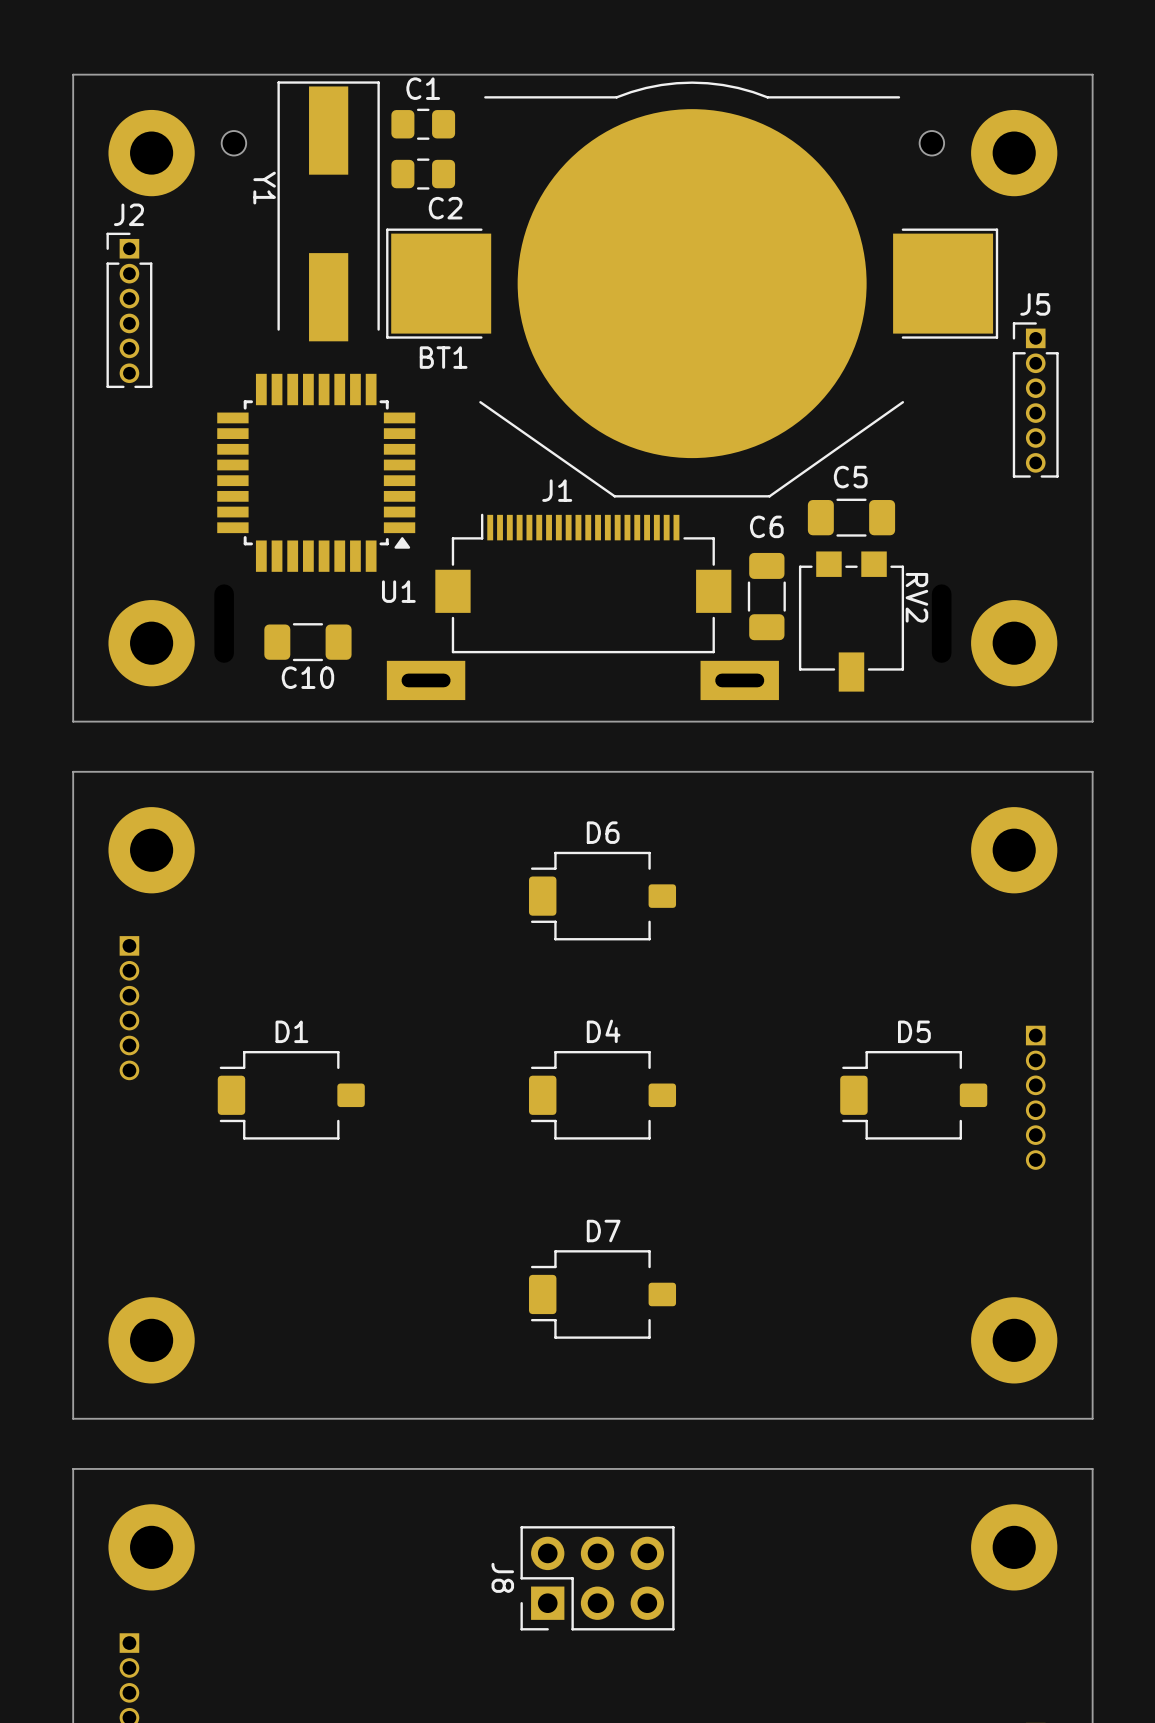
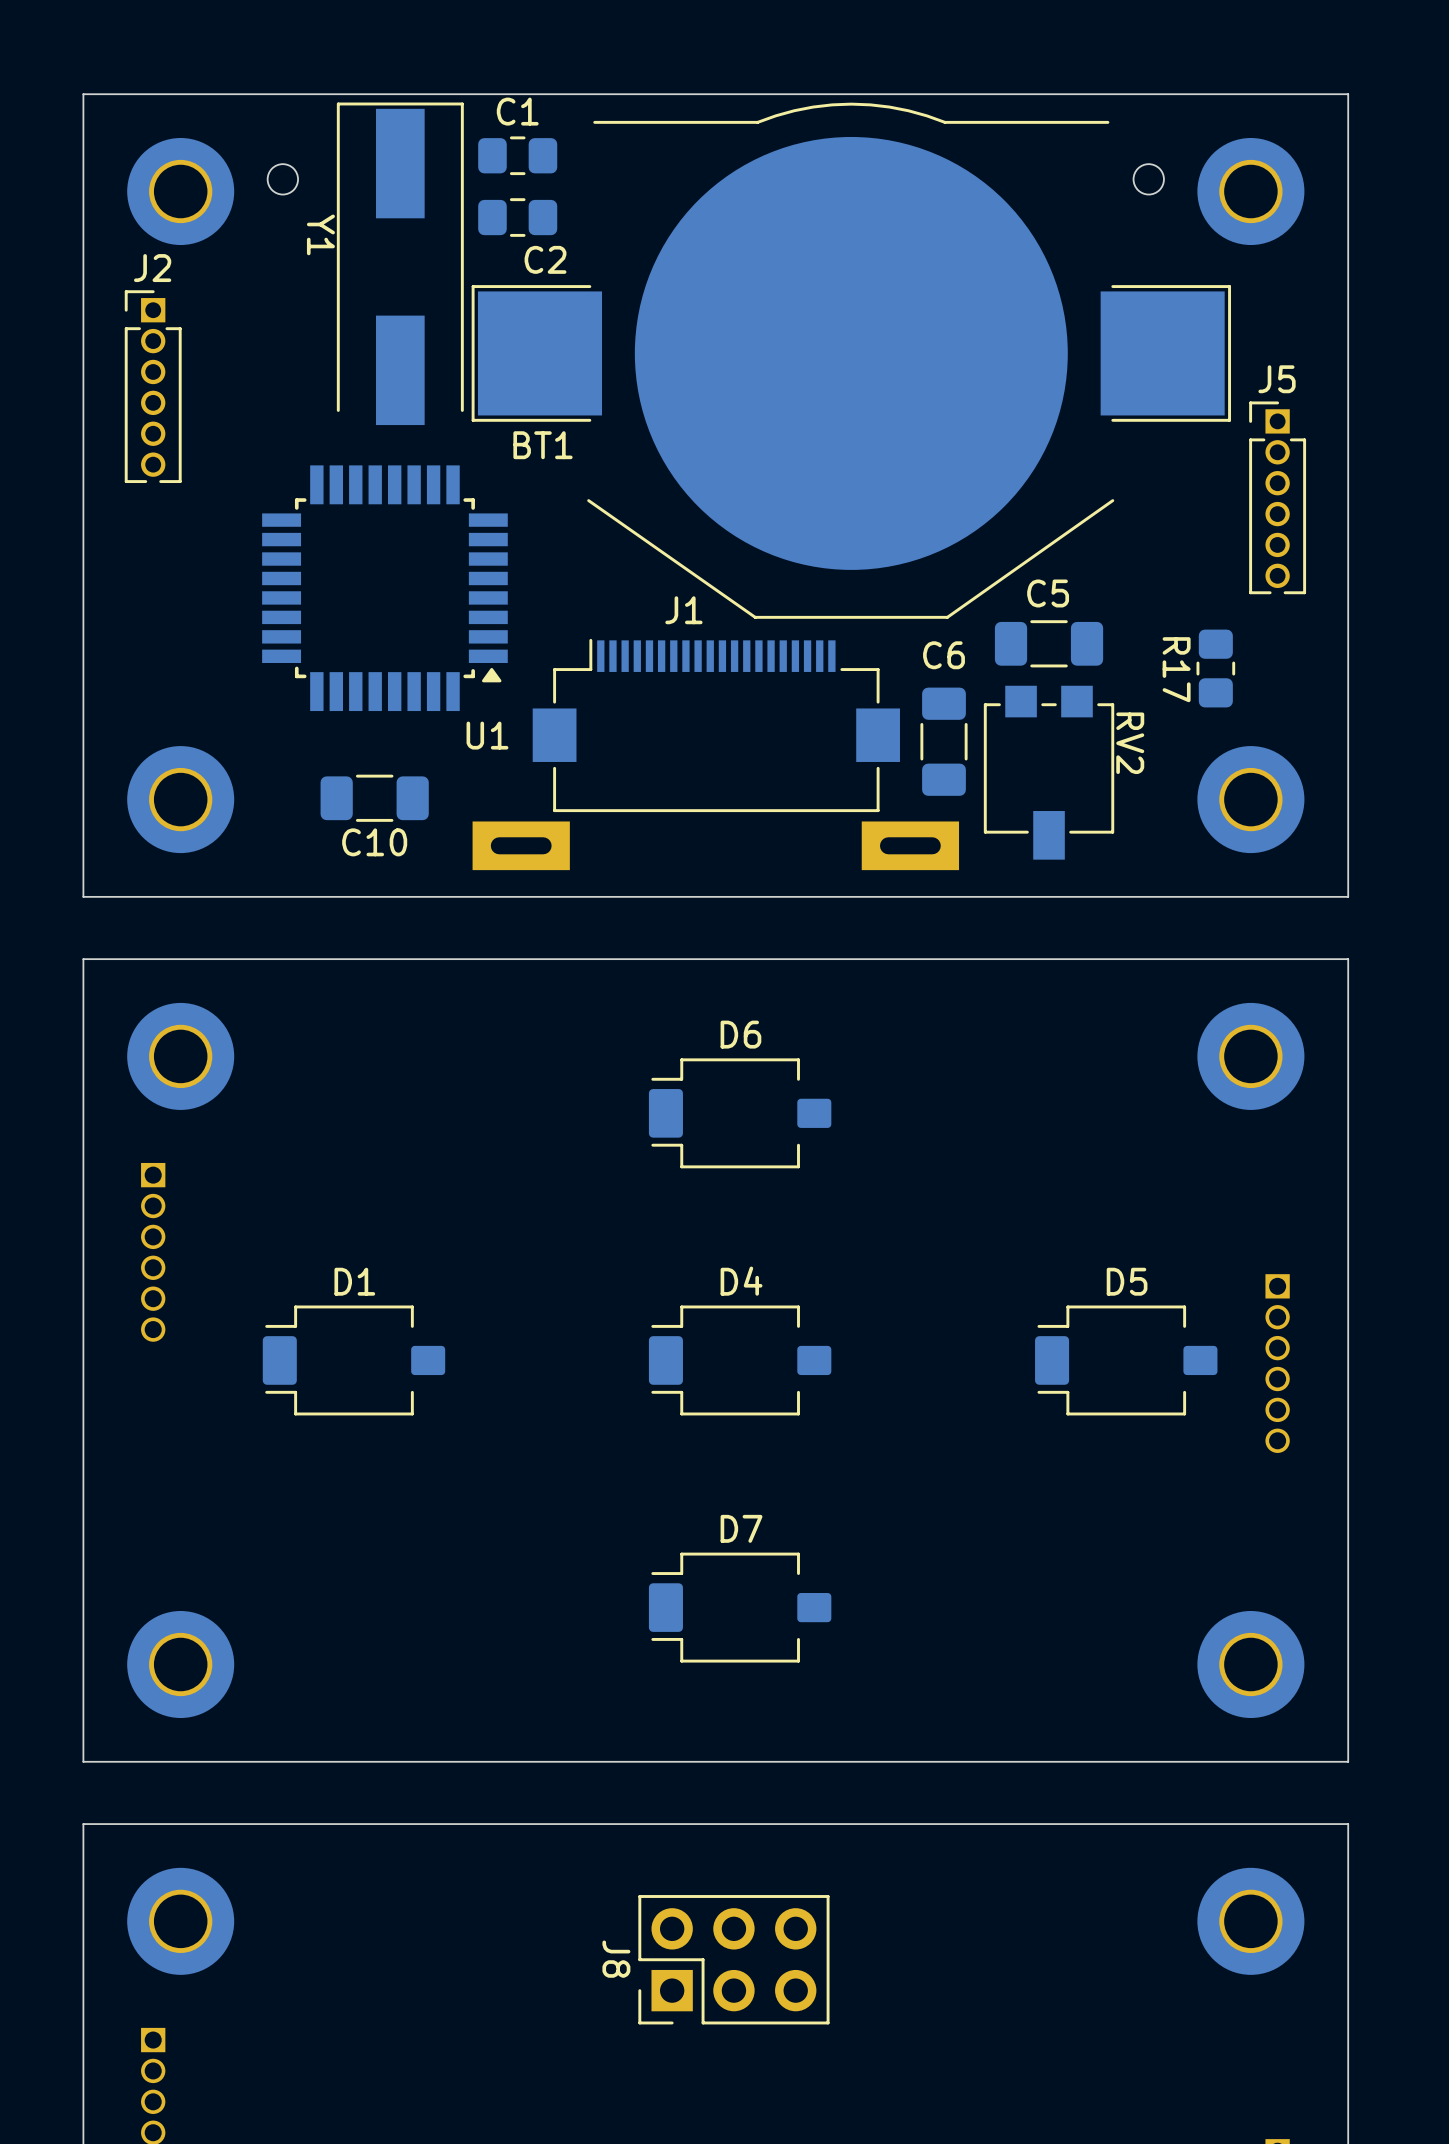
R17: none -> (1215, 668)

